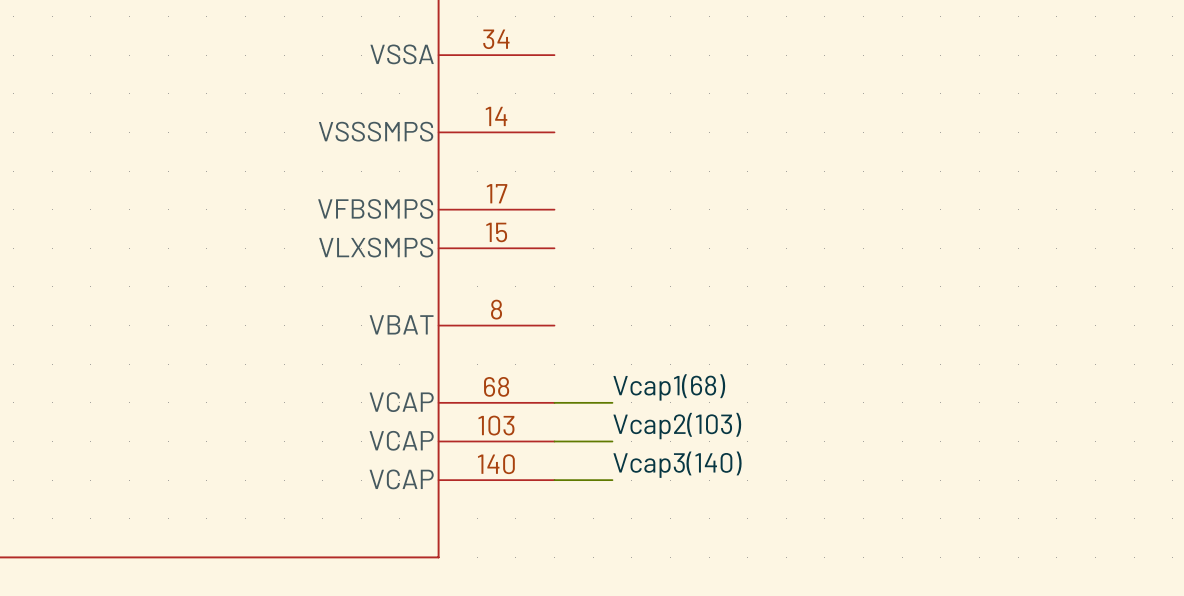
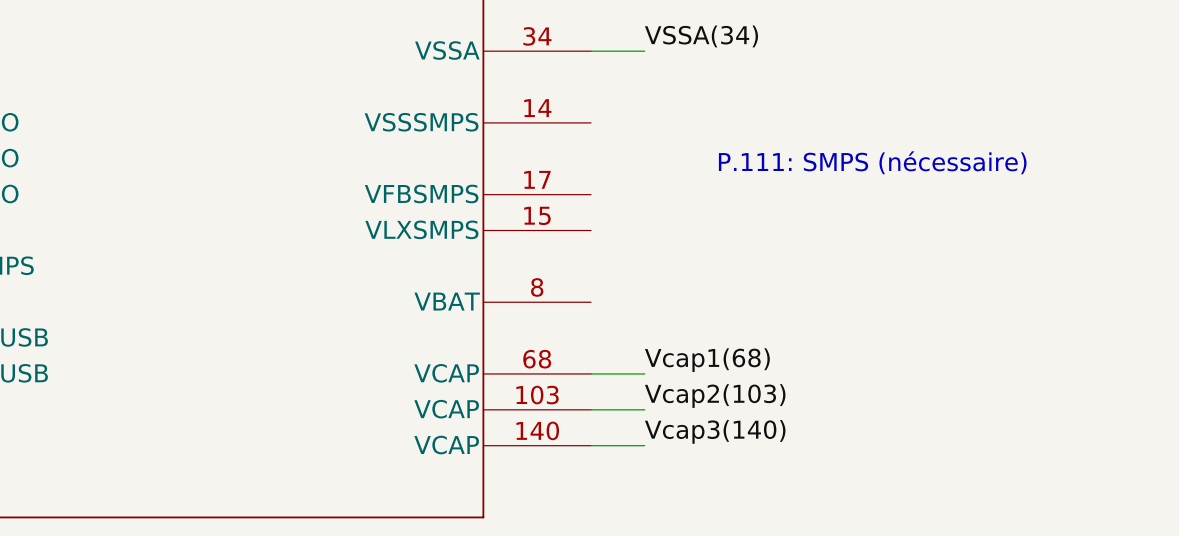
label: none -> VSSA(34) (701, 36)
wire: none -> (590, 51) (644, 51)
text: none -> P.111: SMPS (nécessaire) (872, 162)

